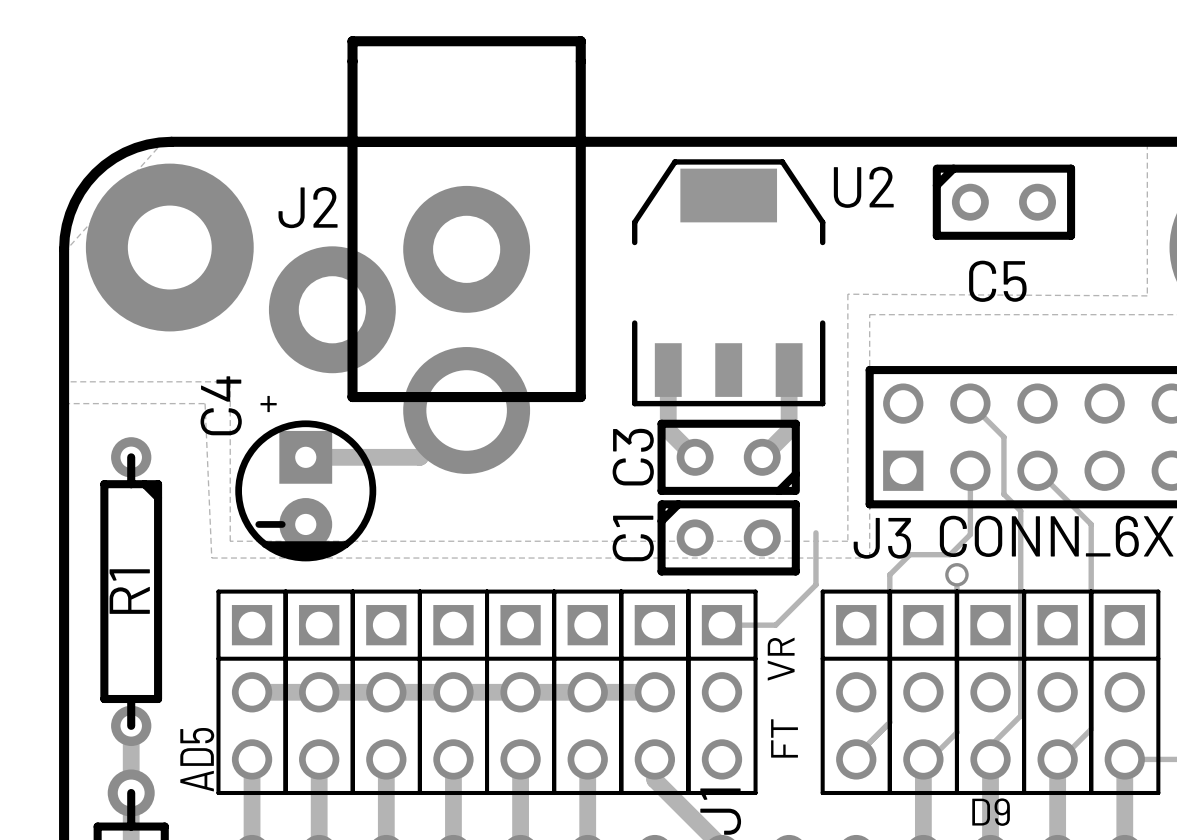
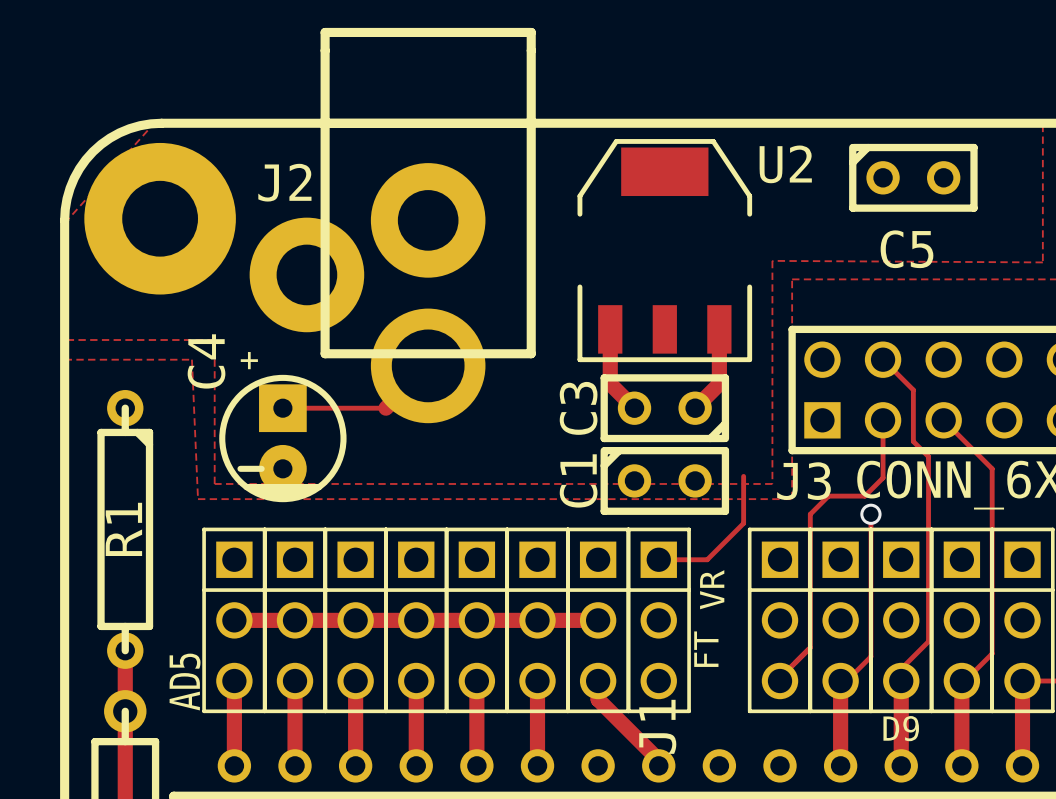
track width: thick (305, 457) (419, 457) -> thin (282, 408) (385, 408)
text position: FT (784, 738) -> FT (706, 649)

